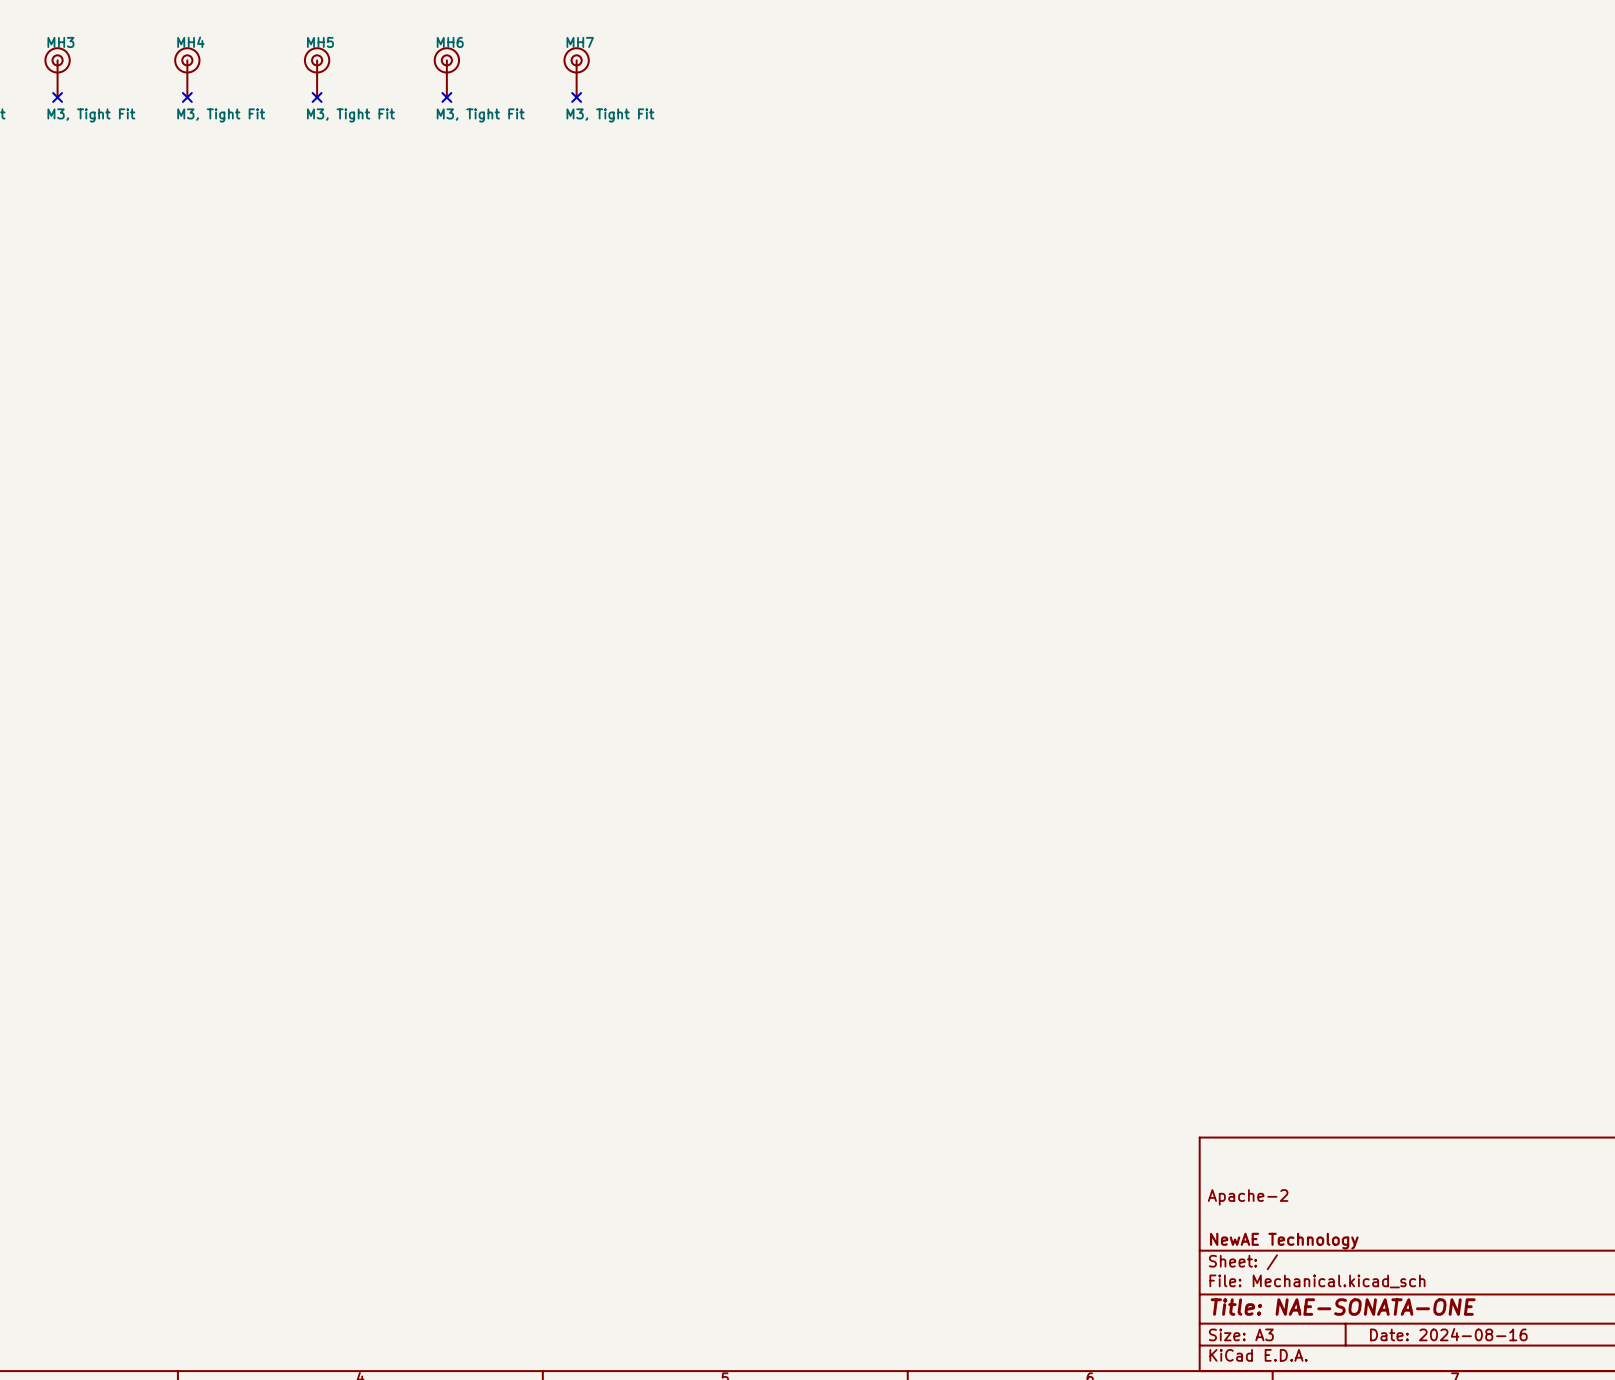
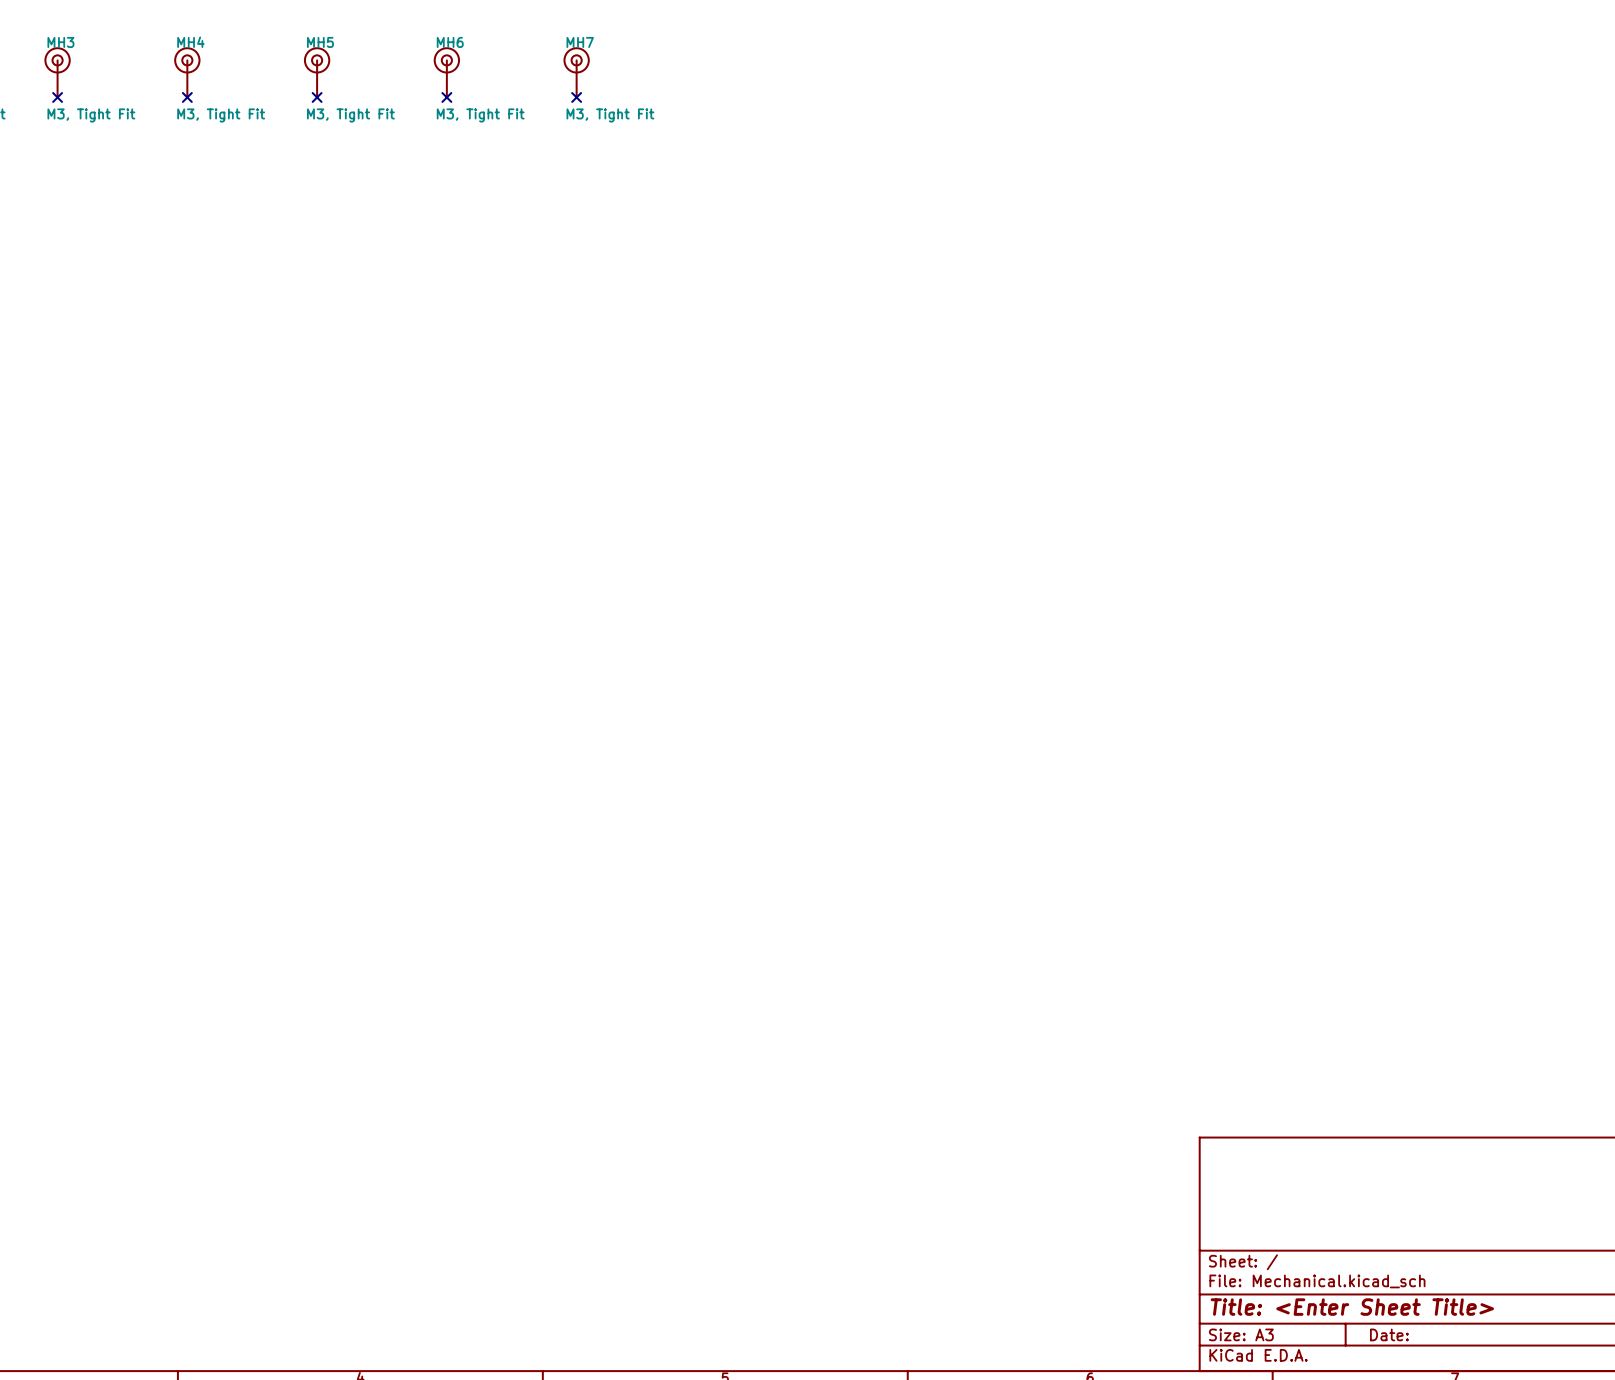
title block: Apache-2 (1248, 1197) -> none
title block: NewAE Technology (1284, 1241) -> none
title block: Title: NAE-SONATA-ONE (1343, 1307) -> Title: <Enter Sheet Title> (1352, 1307)
title block: Date: 2024-08-16 (1448, 1334) -> Date: (1389, 1334)

